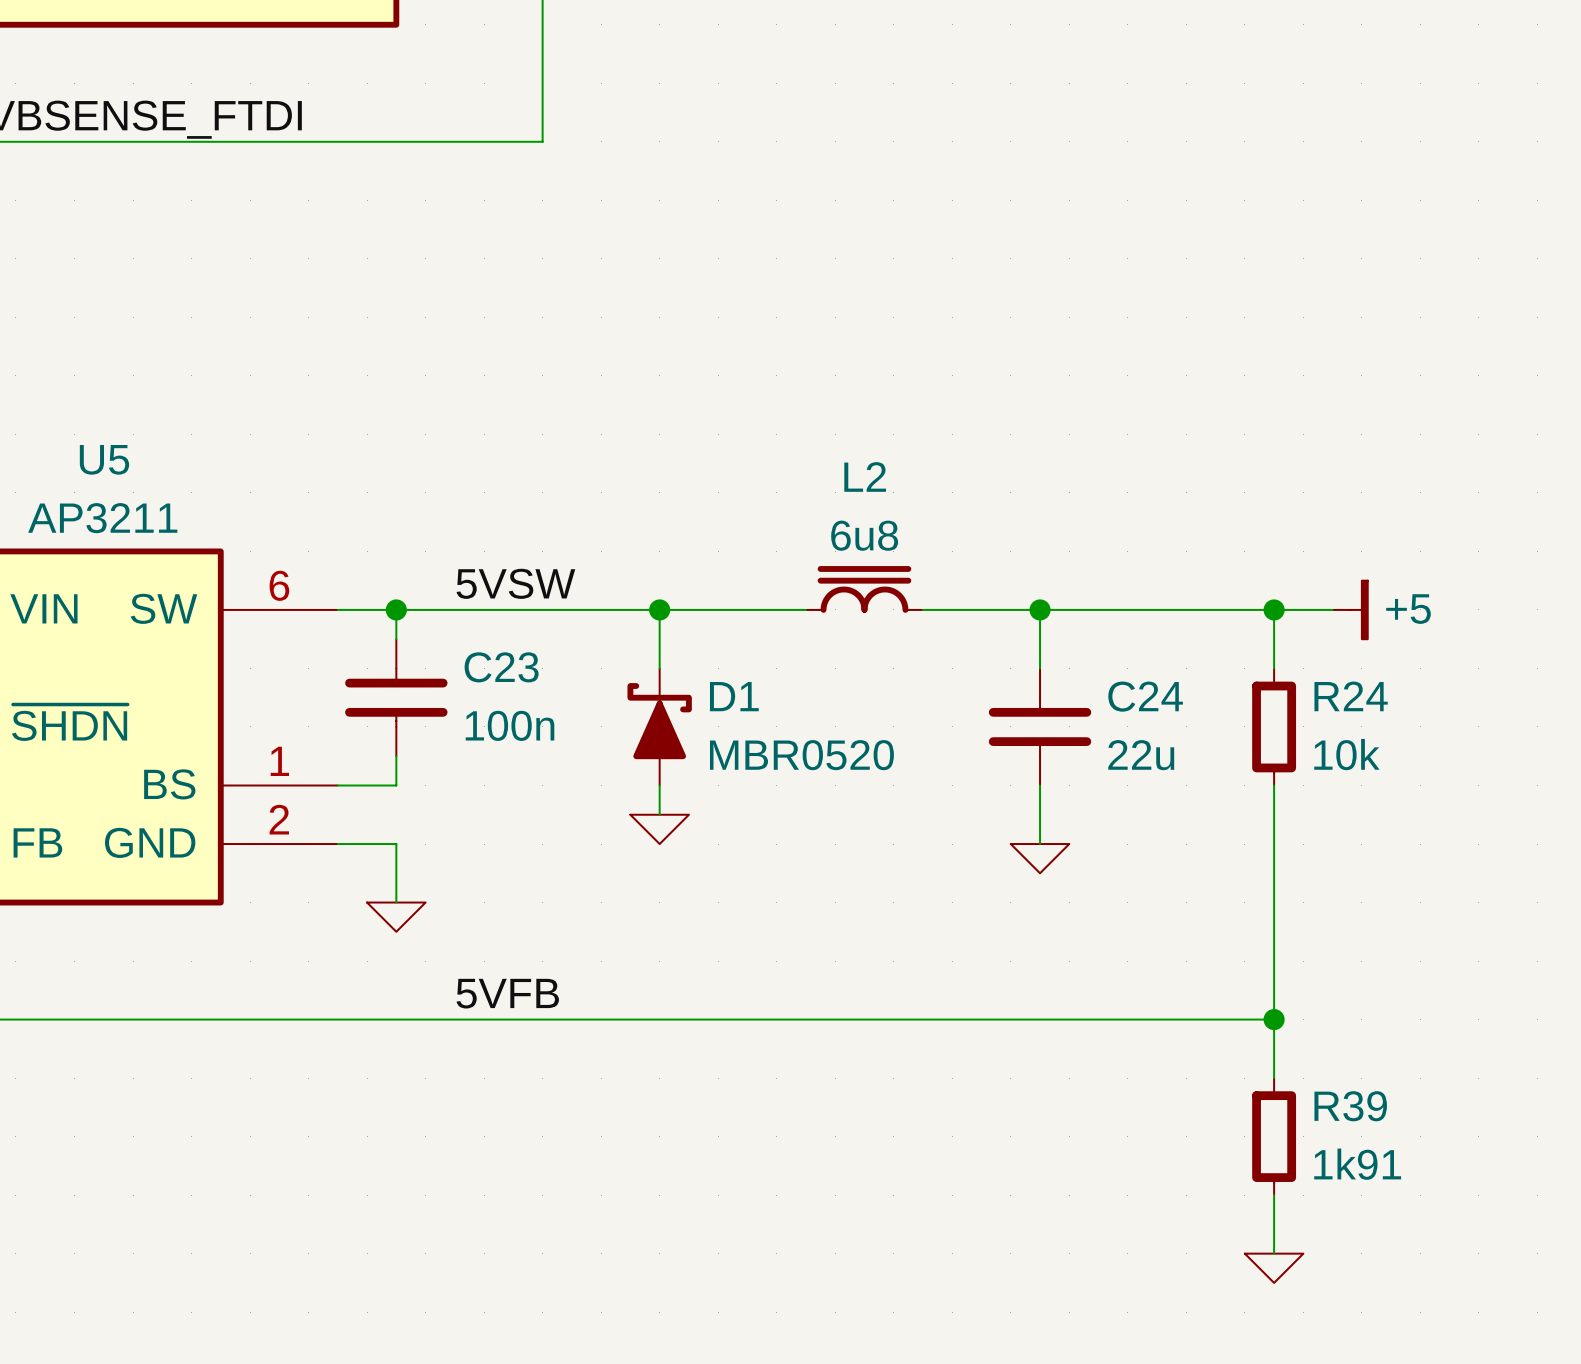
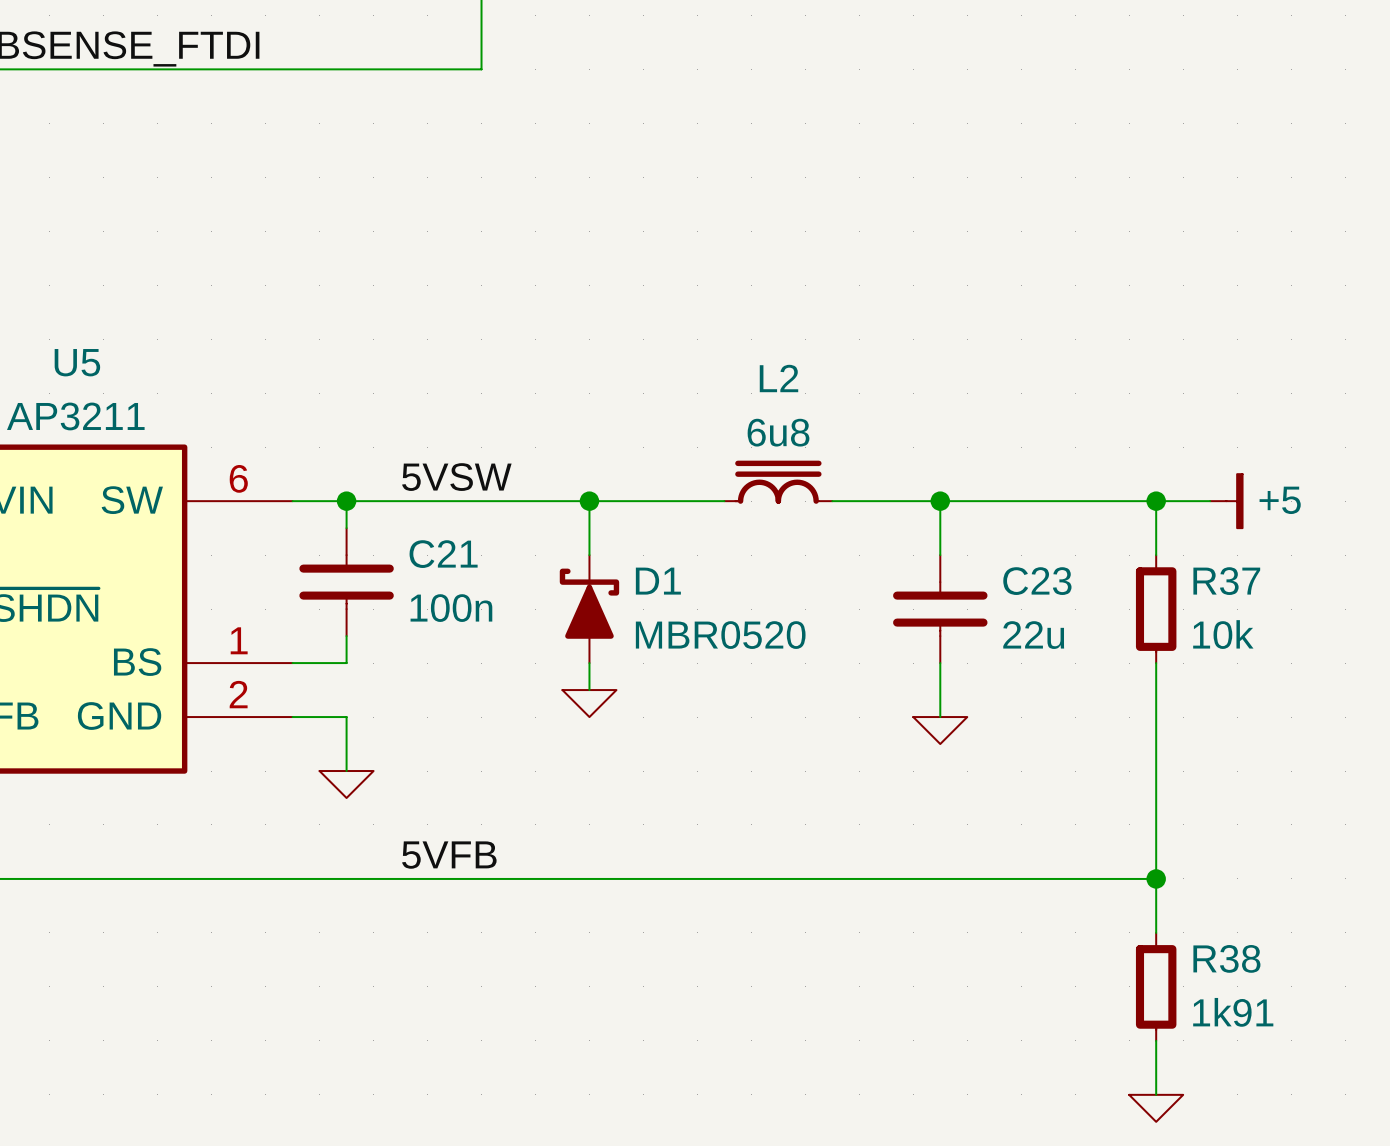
C23 name: C23 (501, 667) -> C21 (443, 554)
C24 name: C24 (1145, 696) -> C23 (1037, 581)
R24 name: R24 (1351, 696) -> R37 (1226, 581)
R39 name: R39 (1350, 1106) -> R38 (1226, 958)

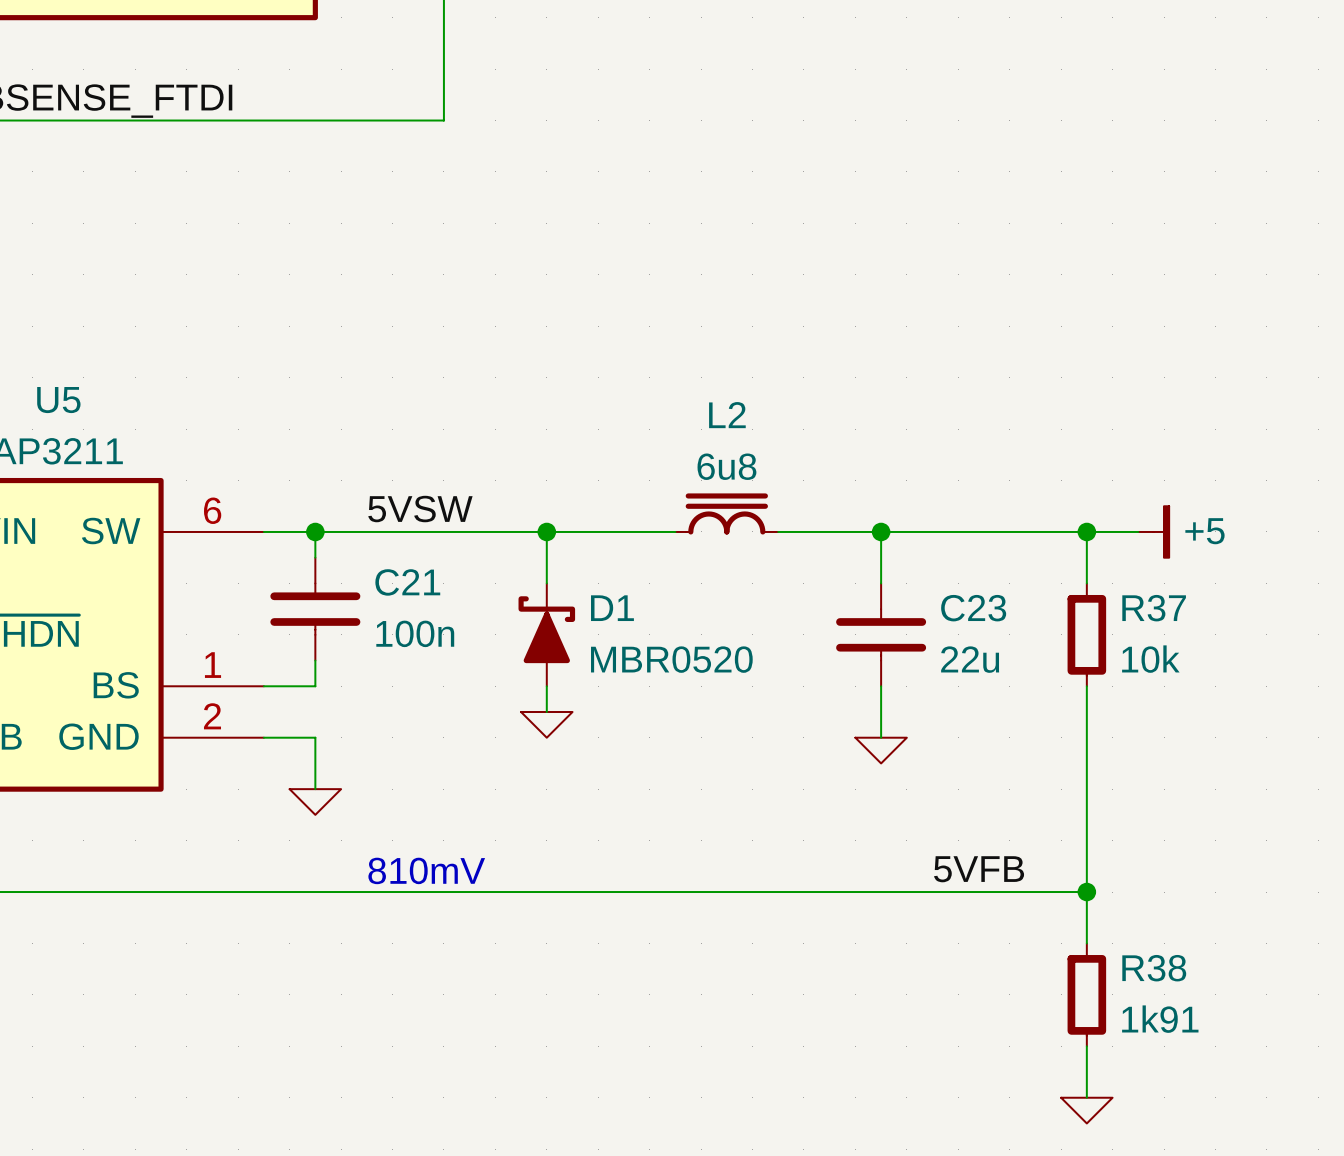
label: 5VFB (449, 855) -> none
label: none -> 5VFB (979, 869)
text: none -> 810mV (426, 870)

